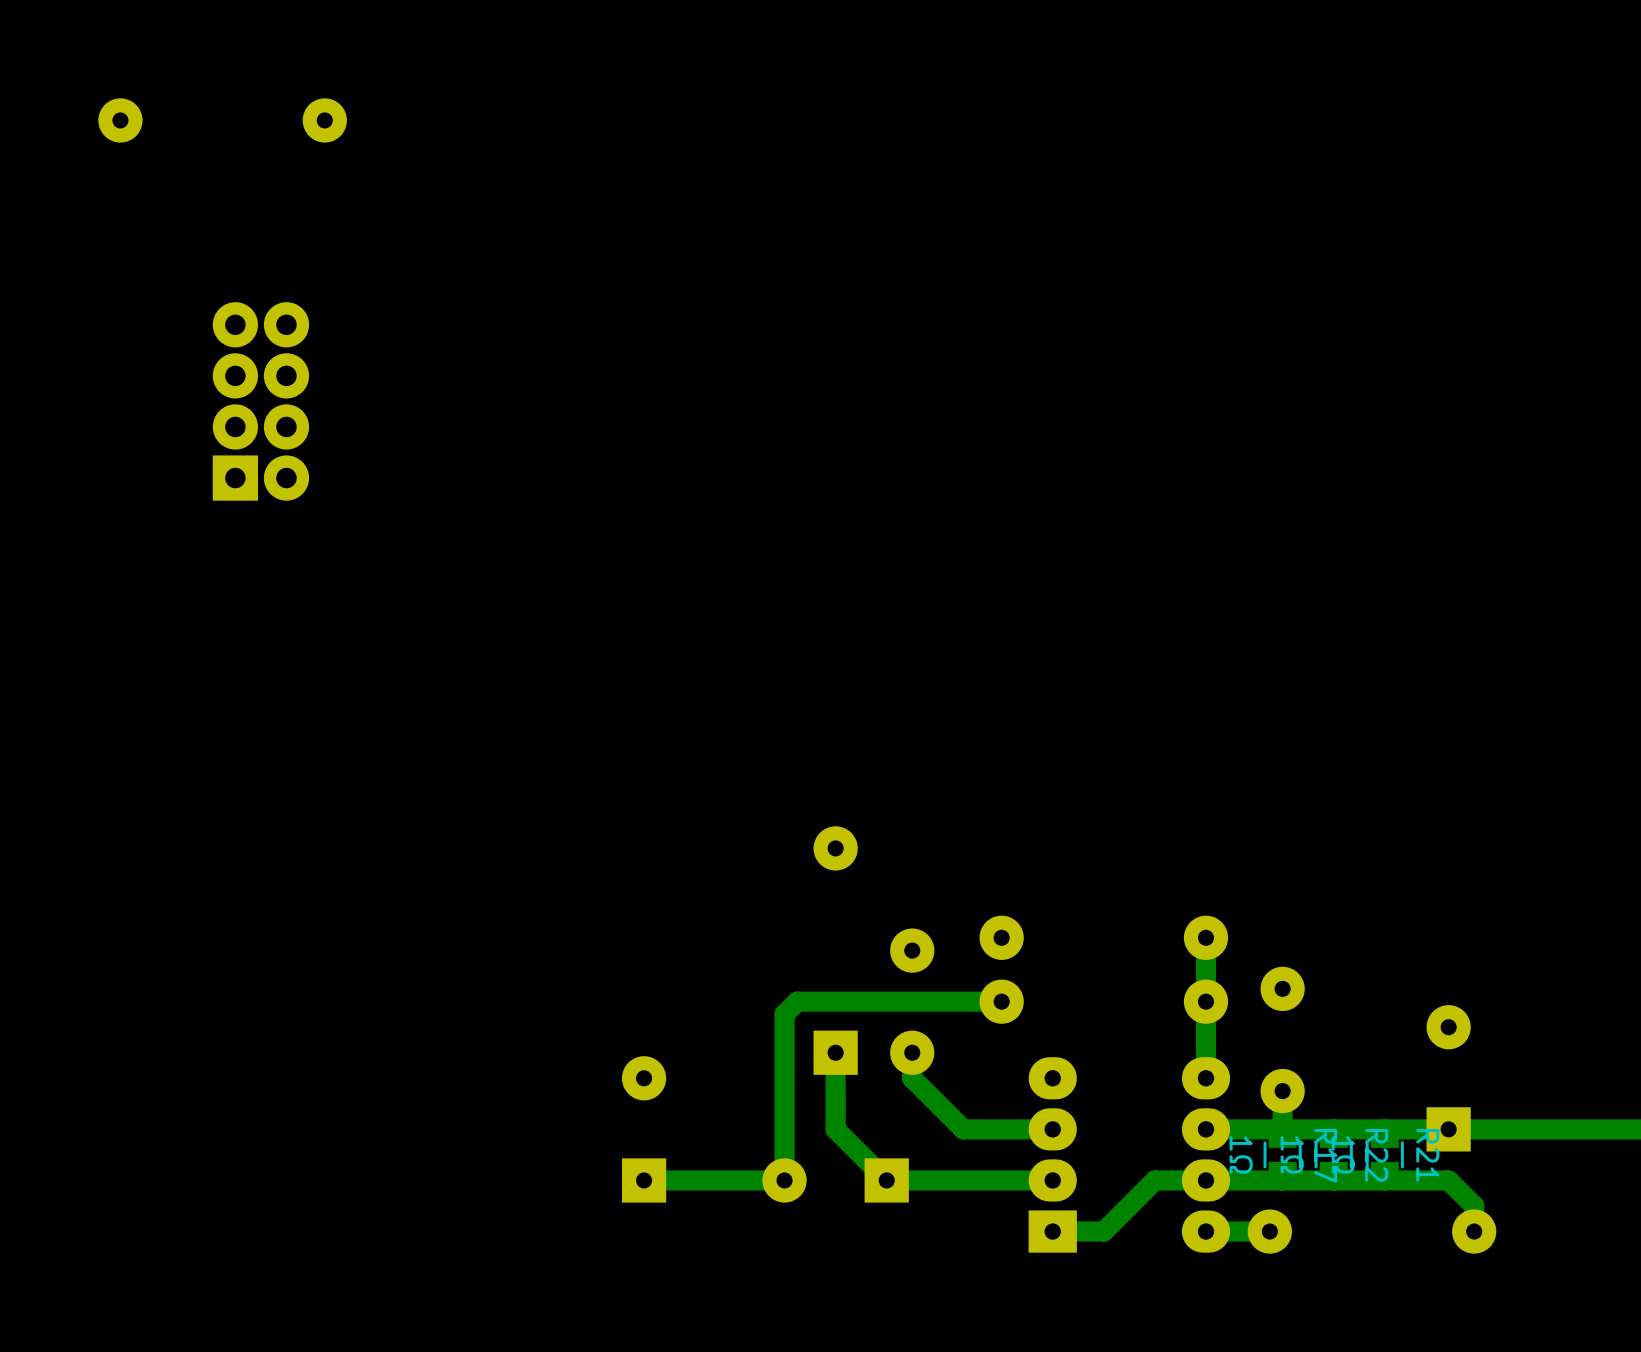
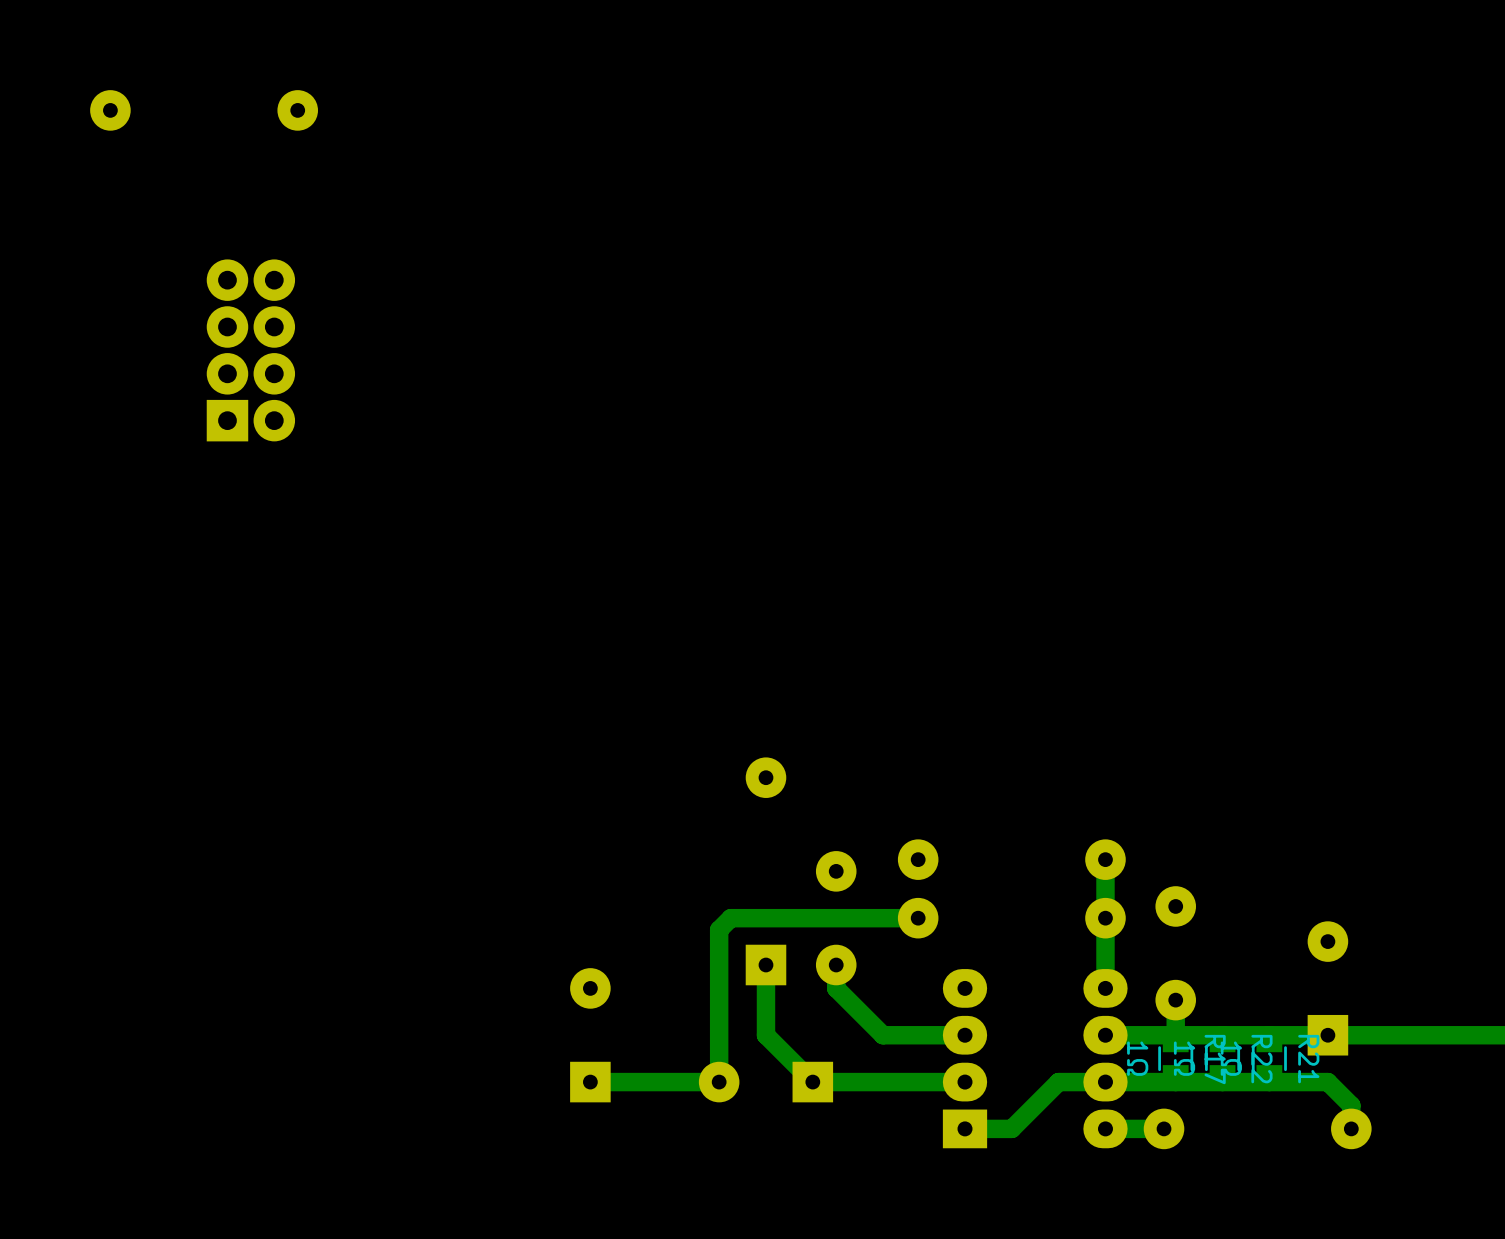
part position: (260, 401) -> (250, 350)

